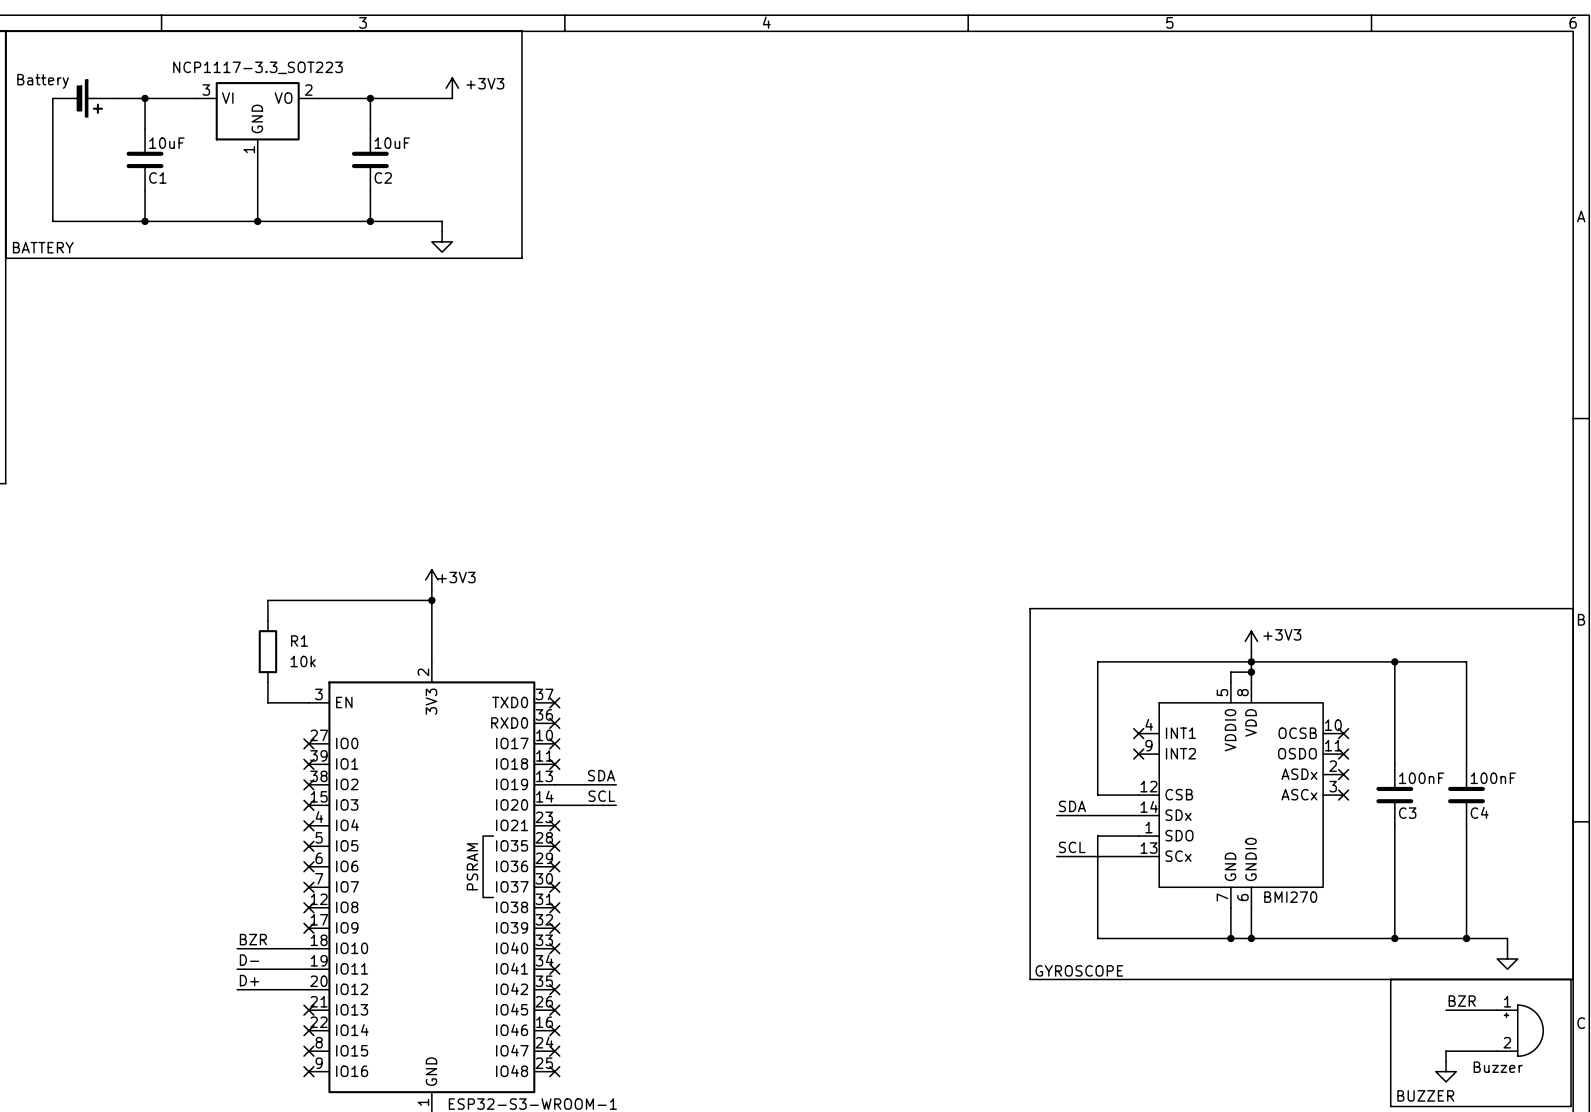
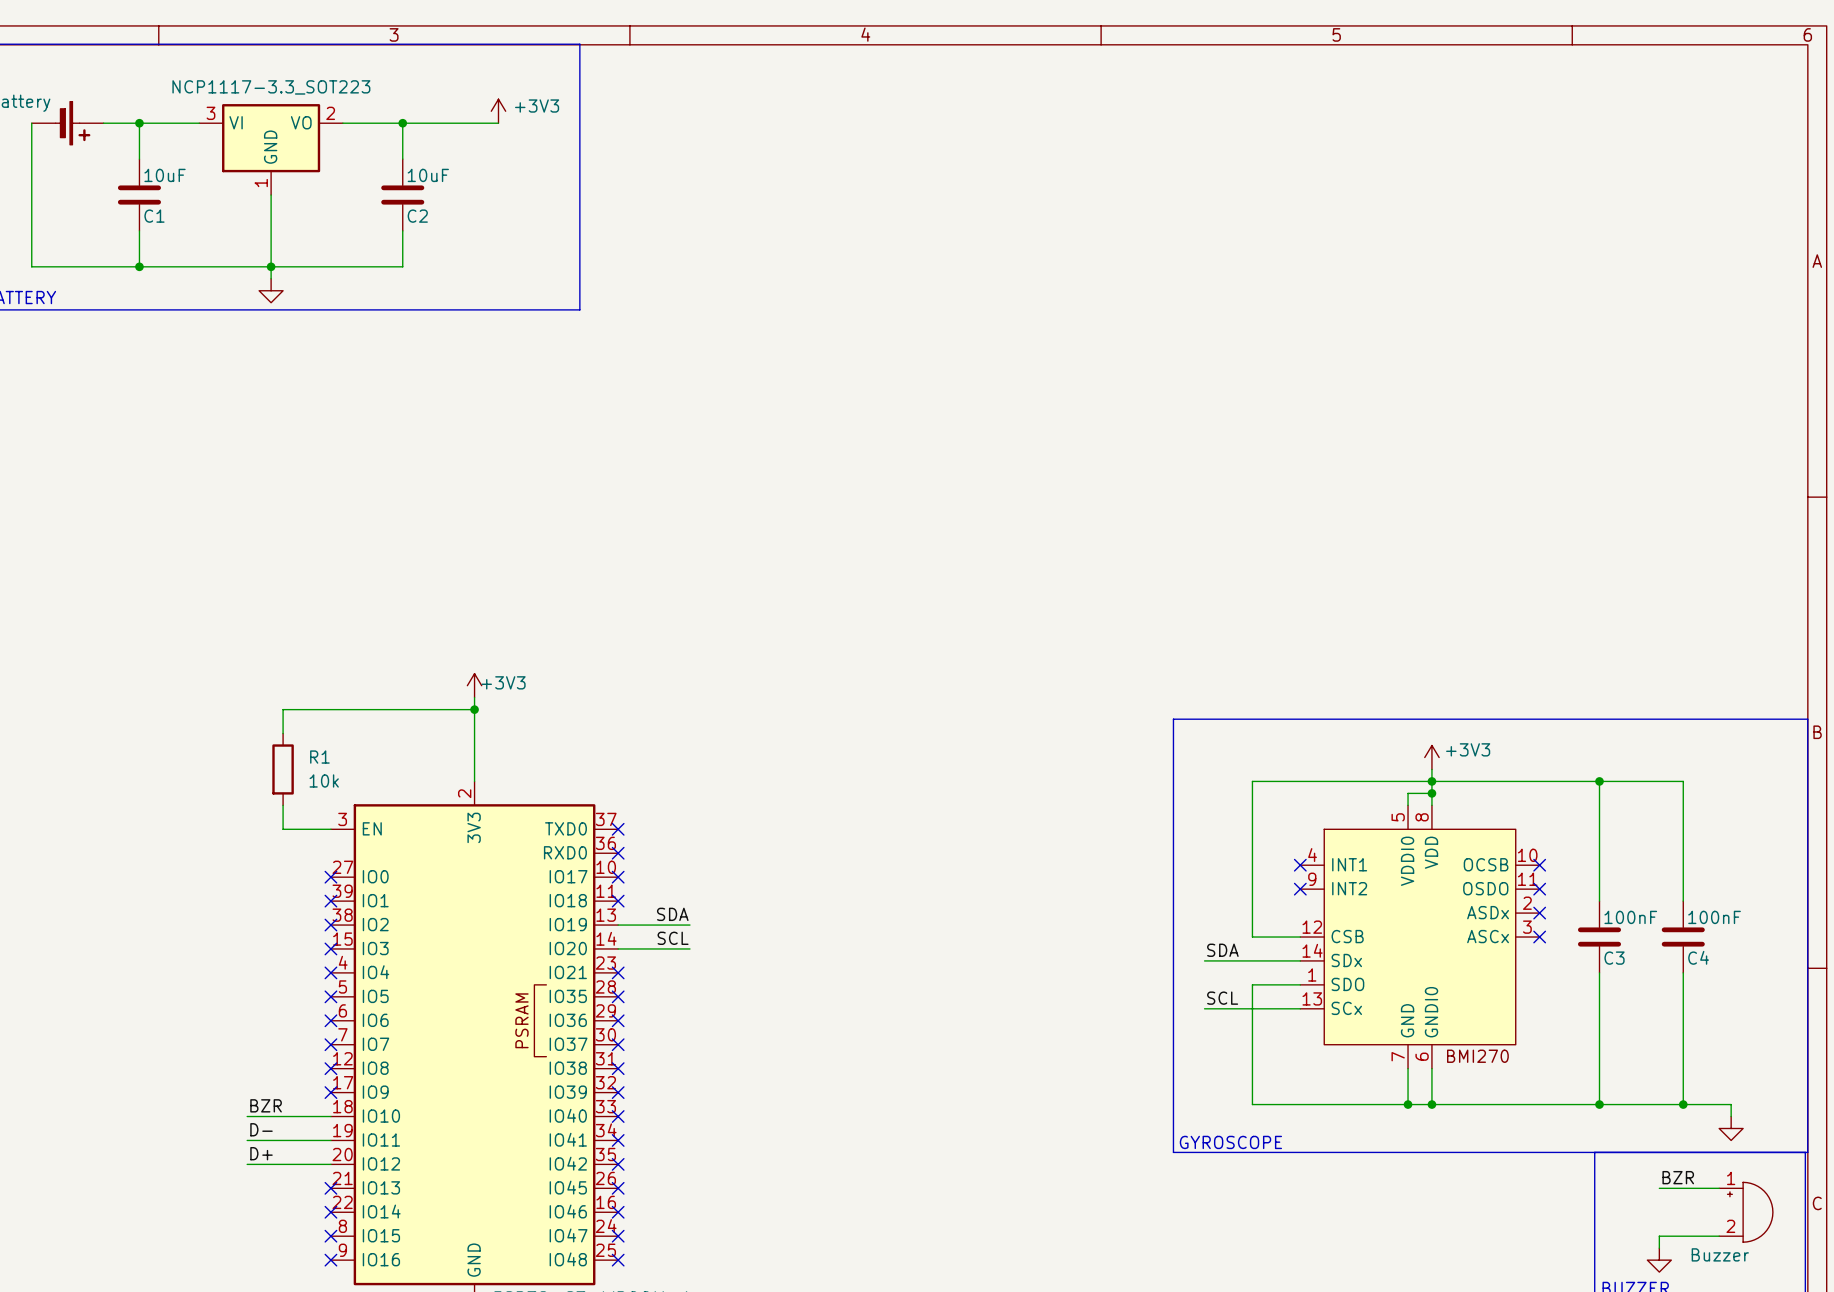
wire: none -> (271, 266) (271, 278)
wire: (370, 221) (442, 221) (442, 231) -> none
junction: (370, 221) -> none
power symbol position: (442, 241) -> (271, 290)

